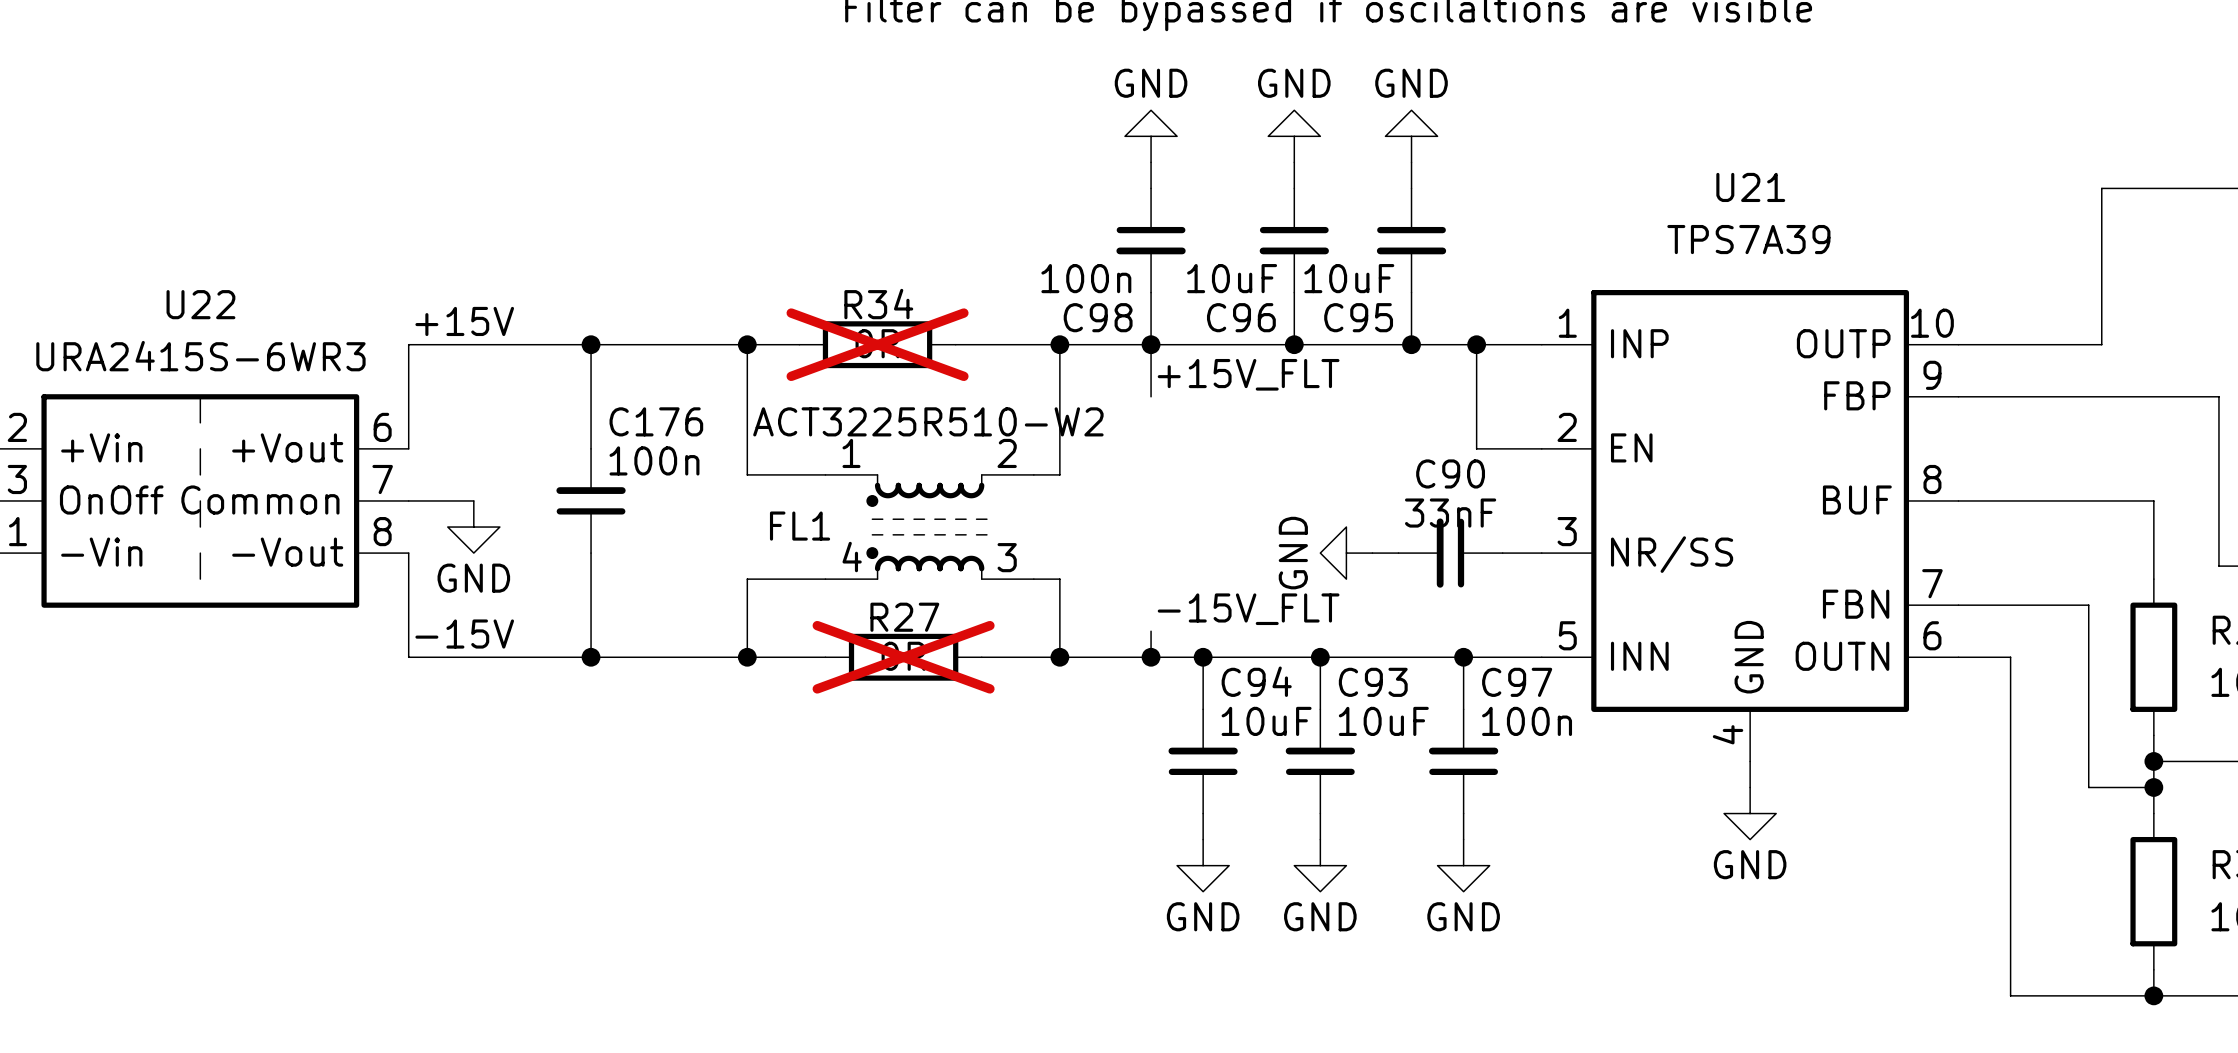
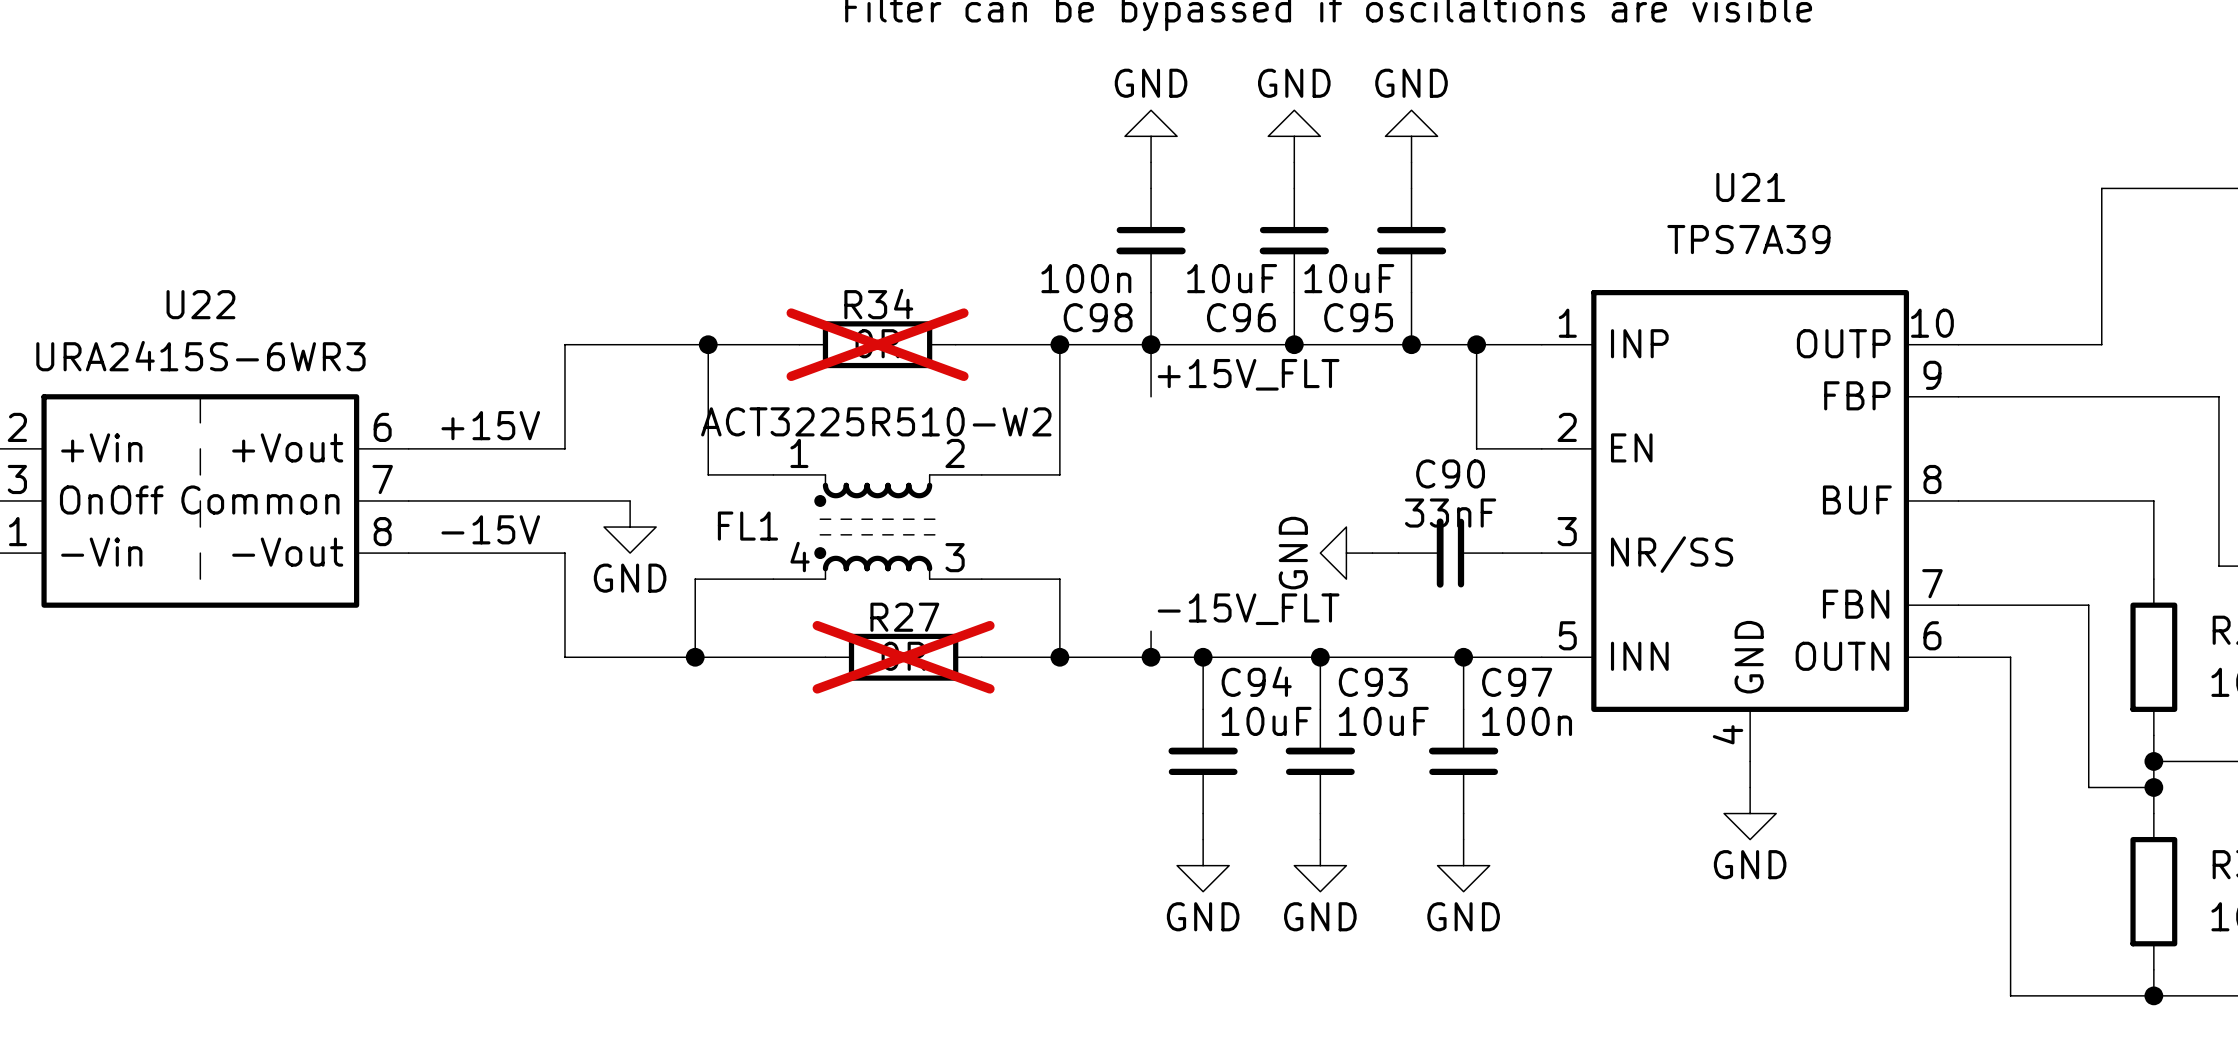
label position: +15V (464, 321) -> +15V (490, 425)
wire: (564, 344) (408, 344) (408, 448) -> (564, 344) (564, 448) (408, 448)
wire: (591, 344) (591, 448) -> none
junction: (591, 344) -> none
wire: (747, 344) (747, 474) -> (708, 344) (708, 474) (747, 474)
junction position: (747, 344) -> (708, 344)
wire: none -> (473, 500) (630, 500)
C176: 100n (591, 500) -> none
power symbol position: GND (473, 527) -> GND (630, 527)
FL1 position: (929, 527) -> (877, 527)
wire: (408, 553) (408, 657) (564, 657) -> (408, 553) (564, 553) (564, 657)
wire: (591, 553) (591, 657) -> none
wire: (747, 579) (747, 657) -> (747, 579) (695, 579) (695, 657)
label position: -15V (464, 634) -> -15V (490, 529)
junction: (591, 657) -> none
junction: none -> (695, 657)
junction: (747, 657) -> none

